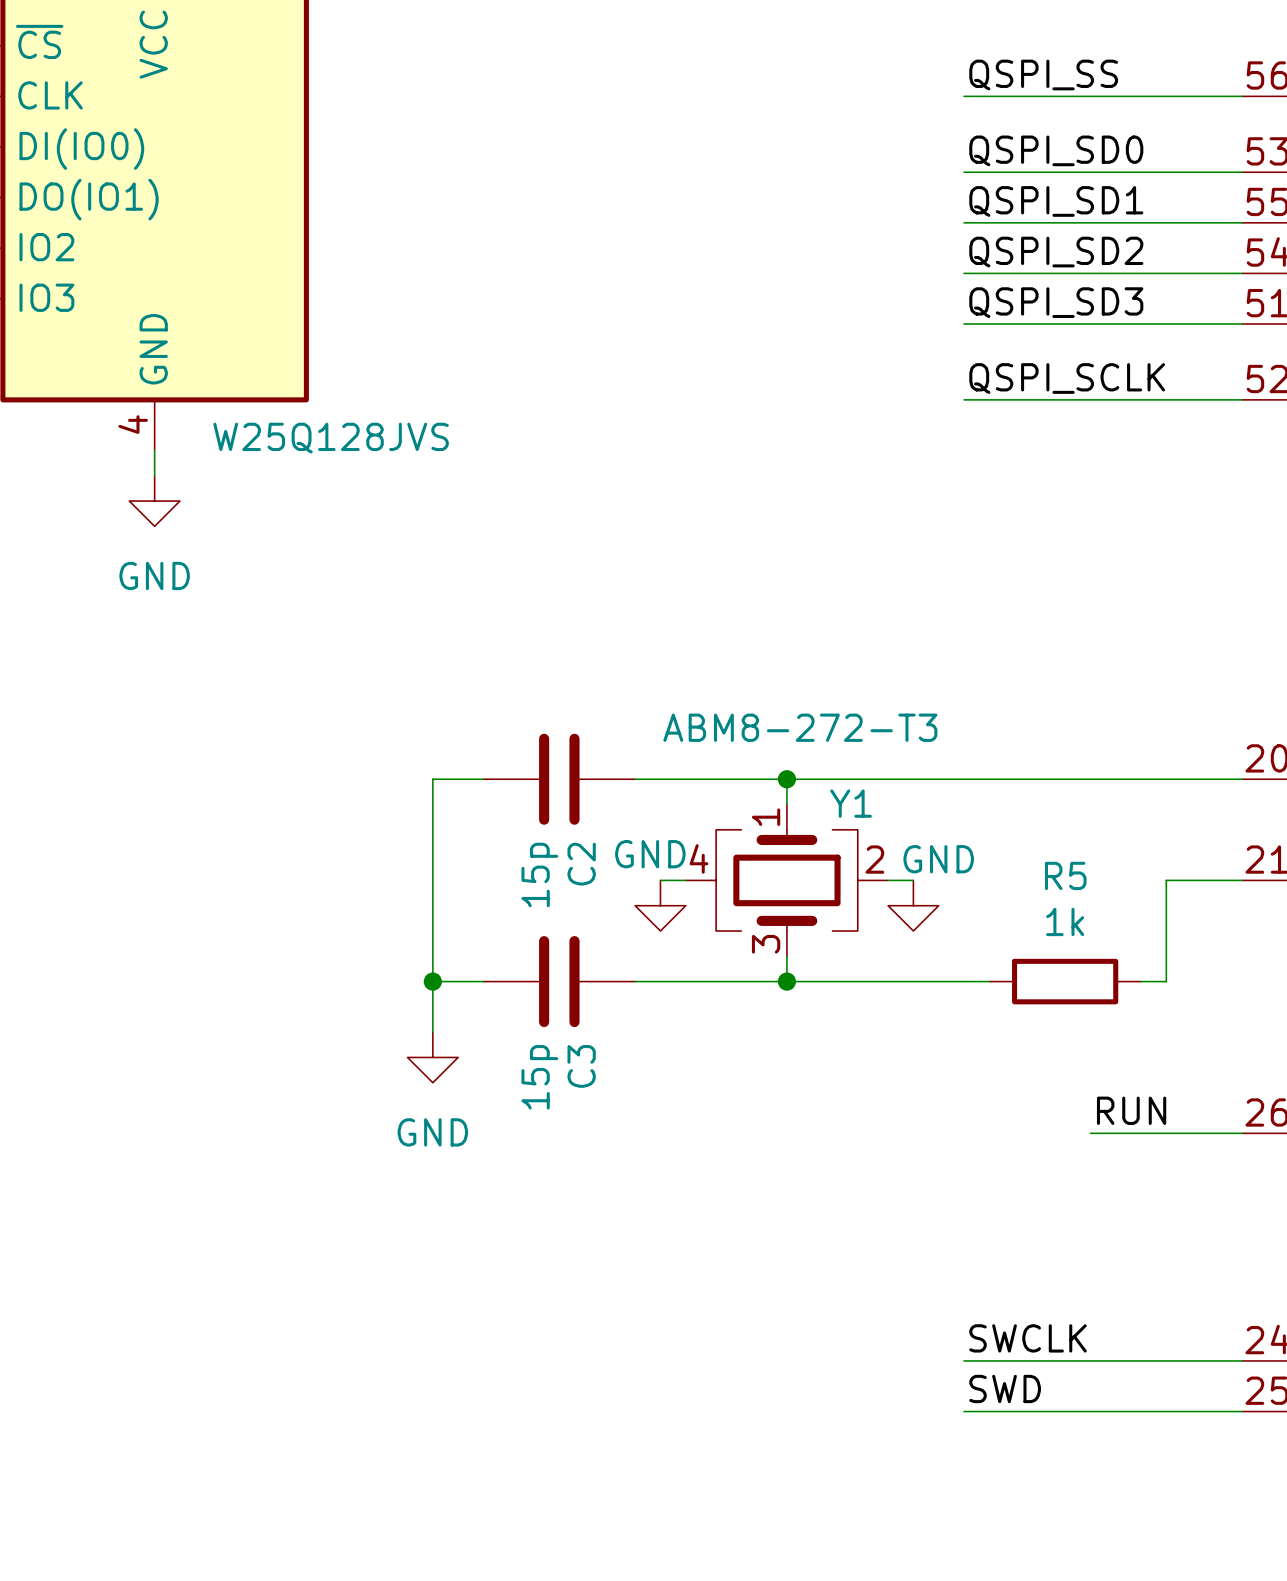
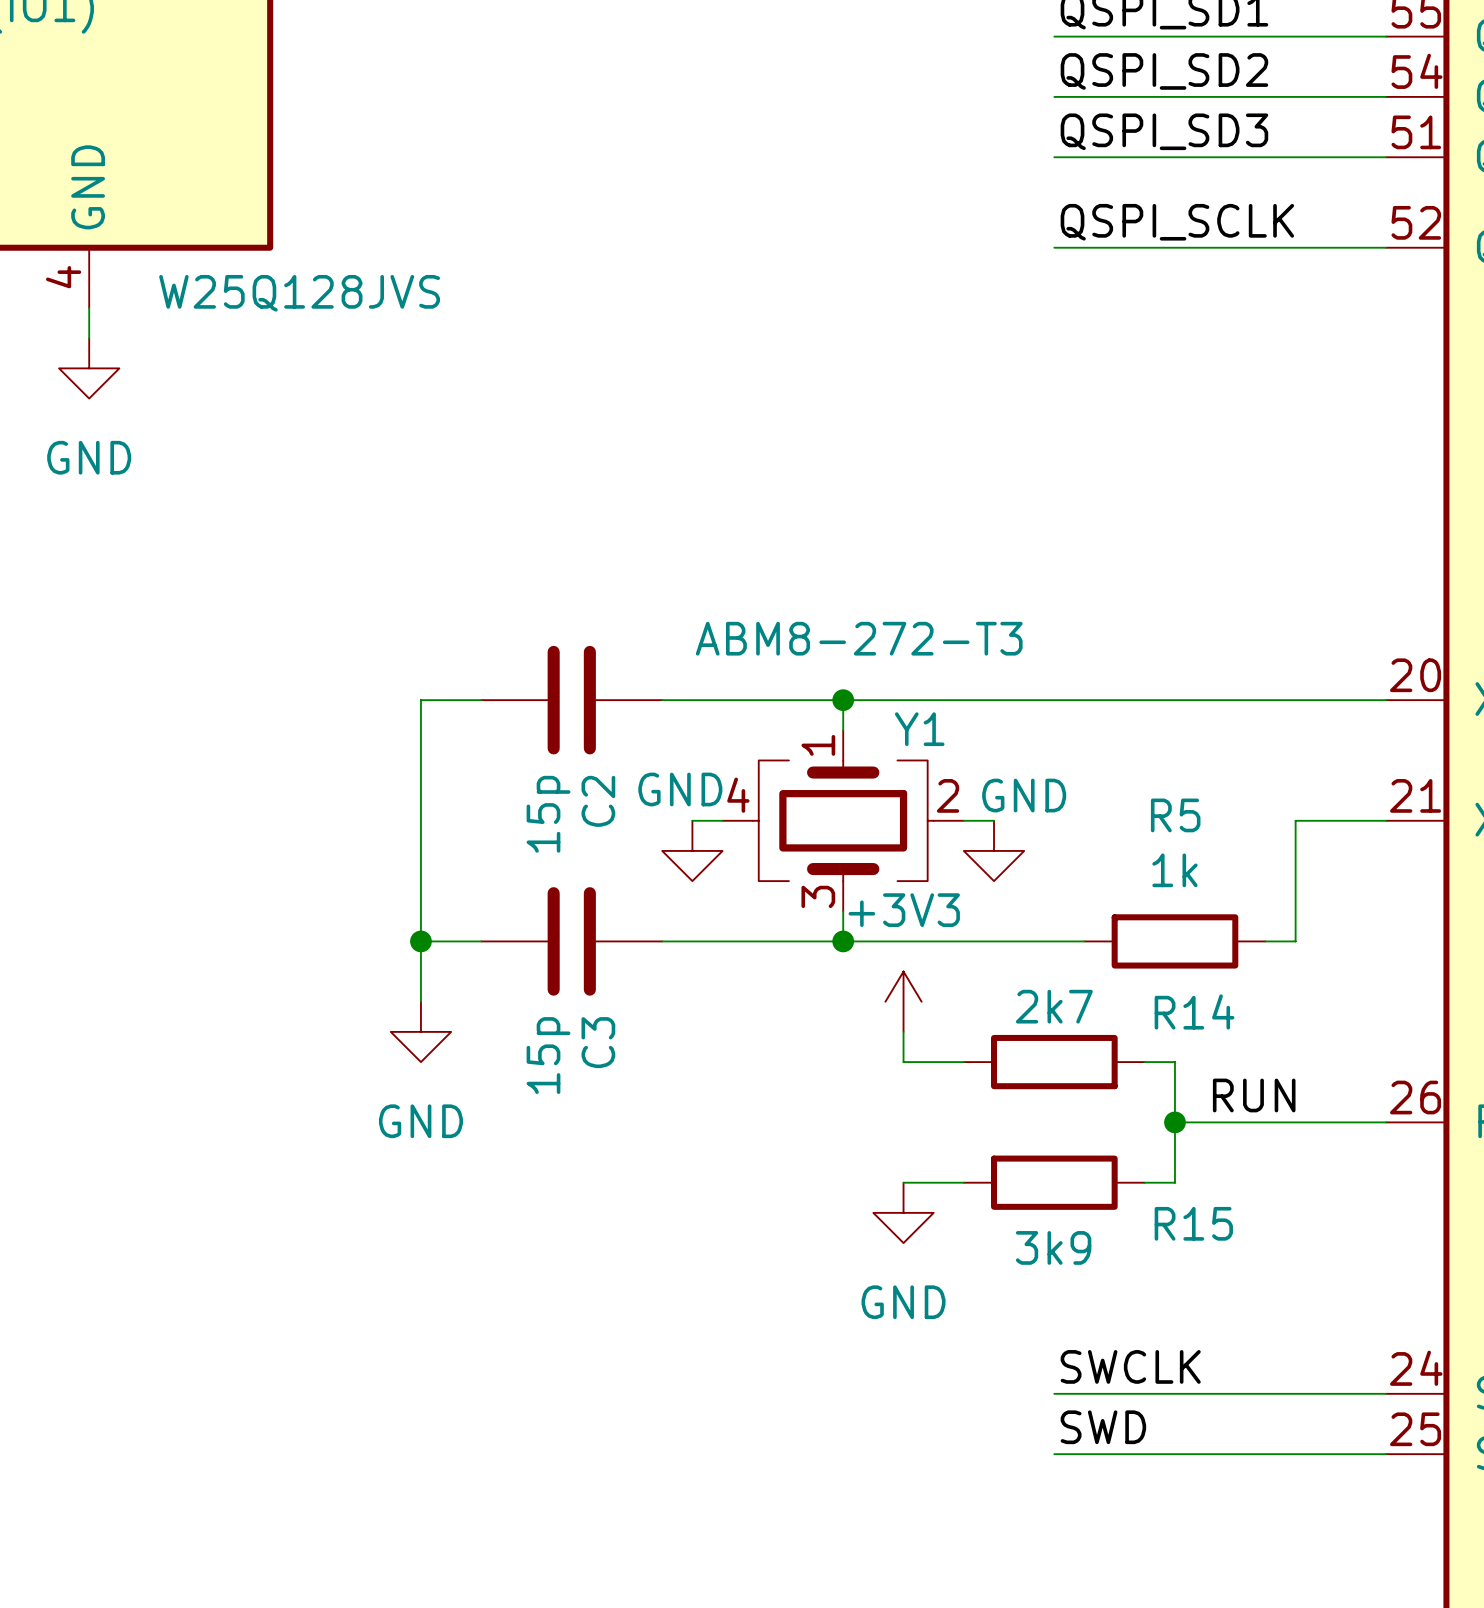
power symbol: none -> +3V3 (903, 1001)
wire: none -> (903, 1031) (903, 1062) (963, 1062)
R14: none -> 2k7 (1054, 1062)
wire: none -> (1144, 1062) (1174, 1062) (1174, 1182) (1144, 1182)
wire: none -> (1174, 1122) (1205, 1122)
junction: none -> (1174, 1122)
wire: none -> (903, 1182) (963, 1182)
R15: none -> 3k9 (1054, 1182)
power symbol: none -> GND (903, 1212)

